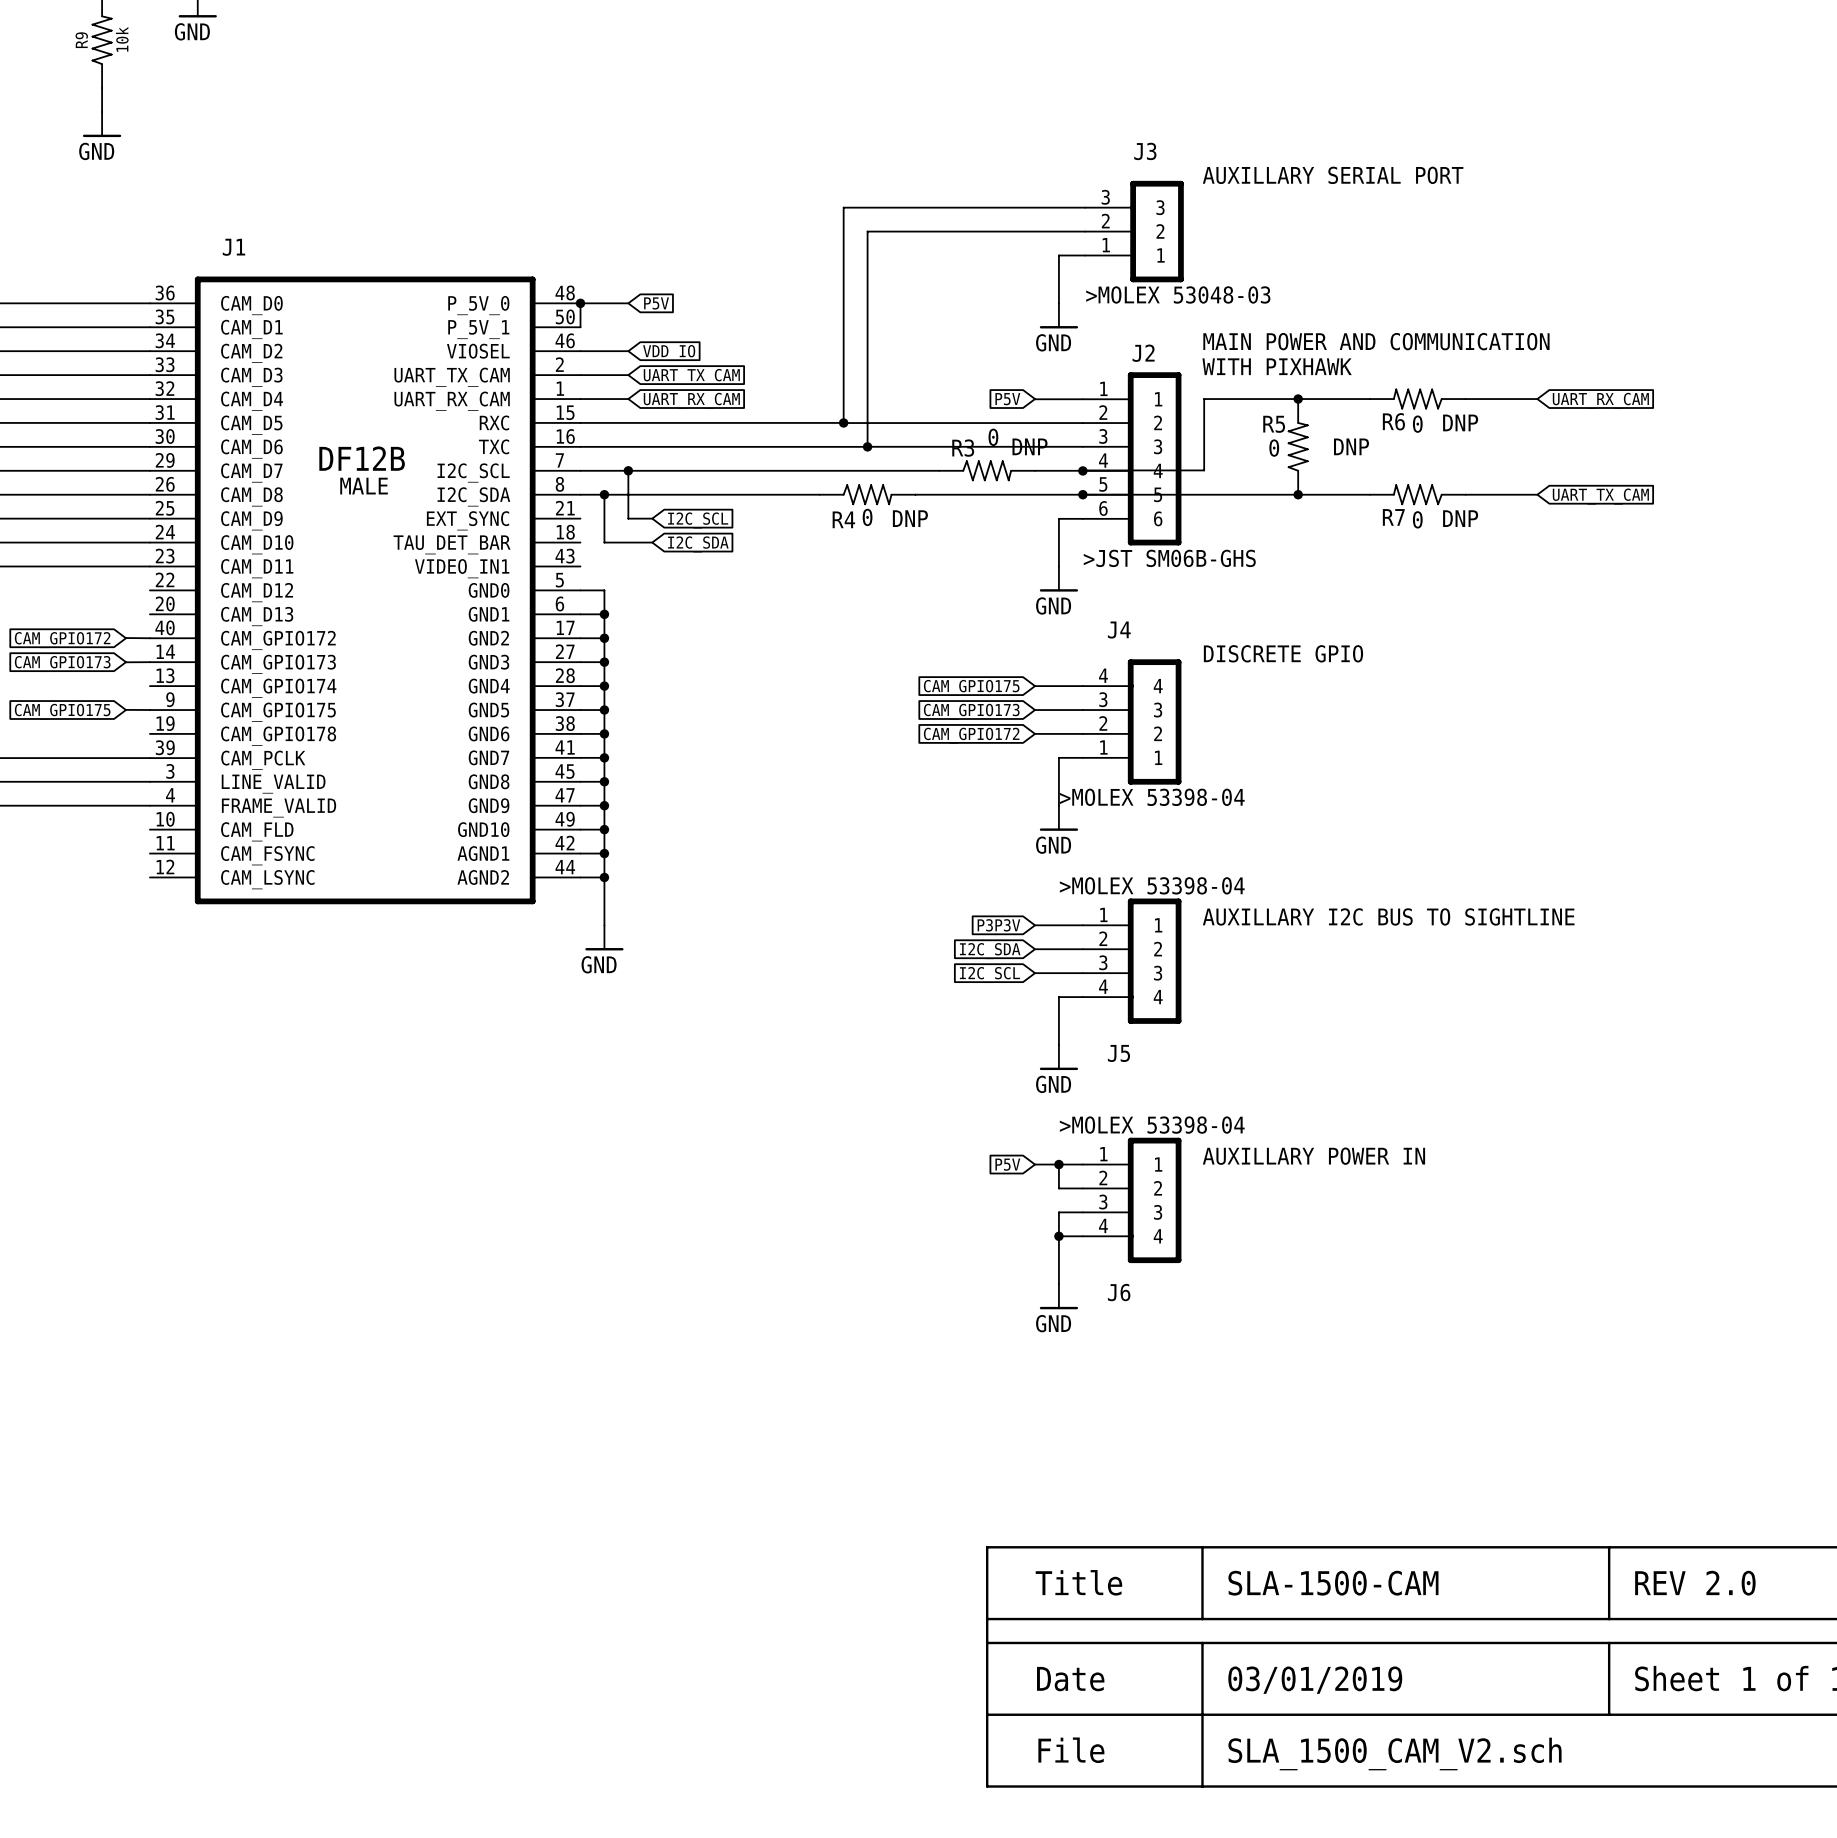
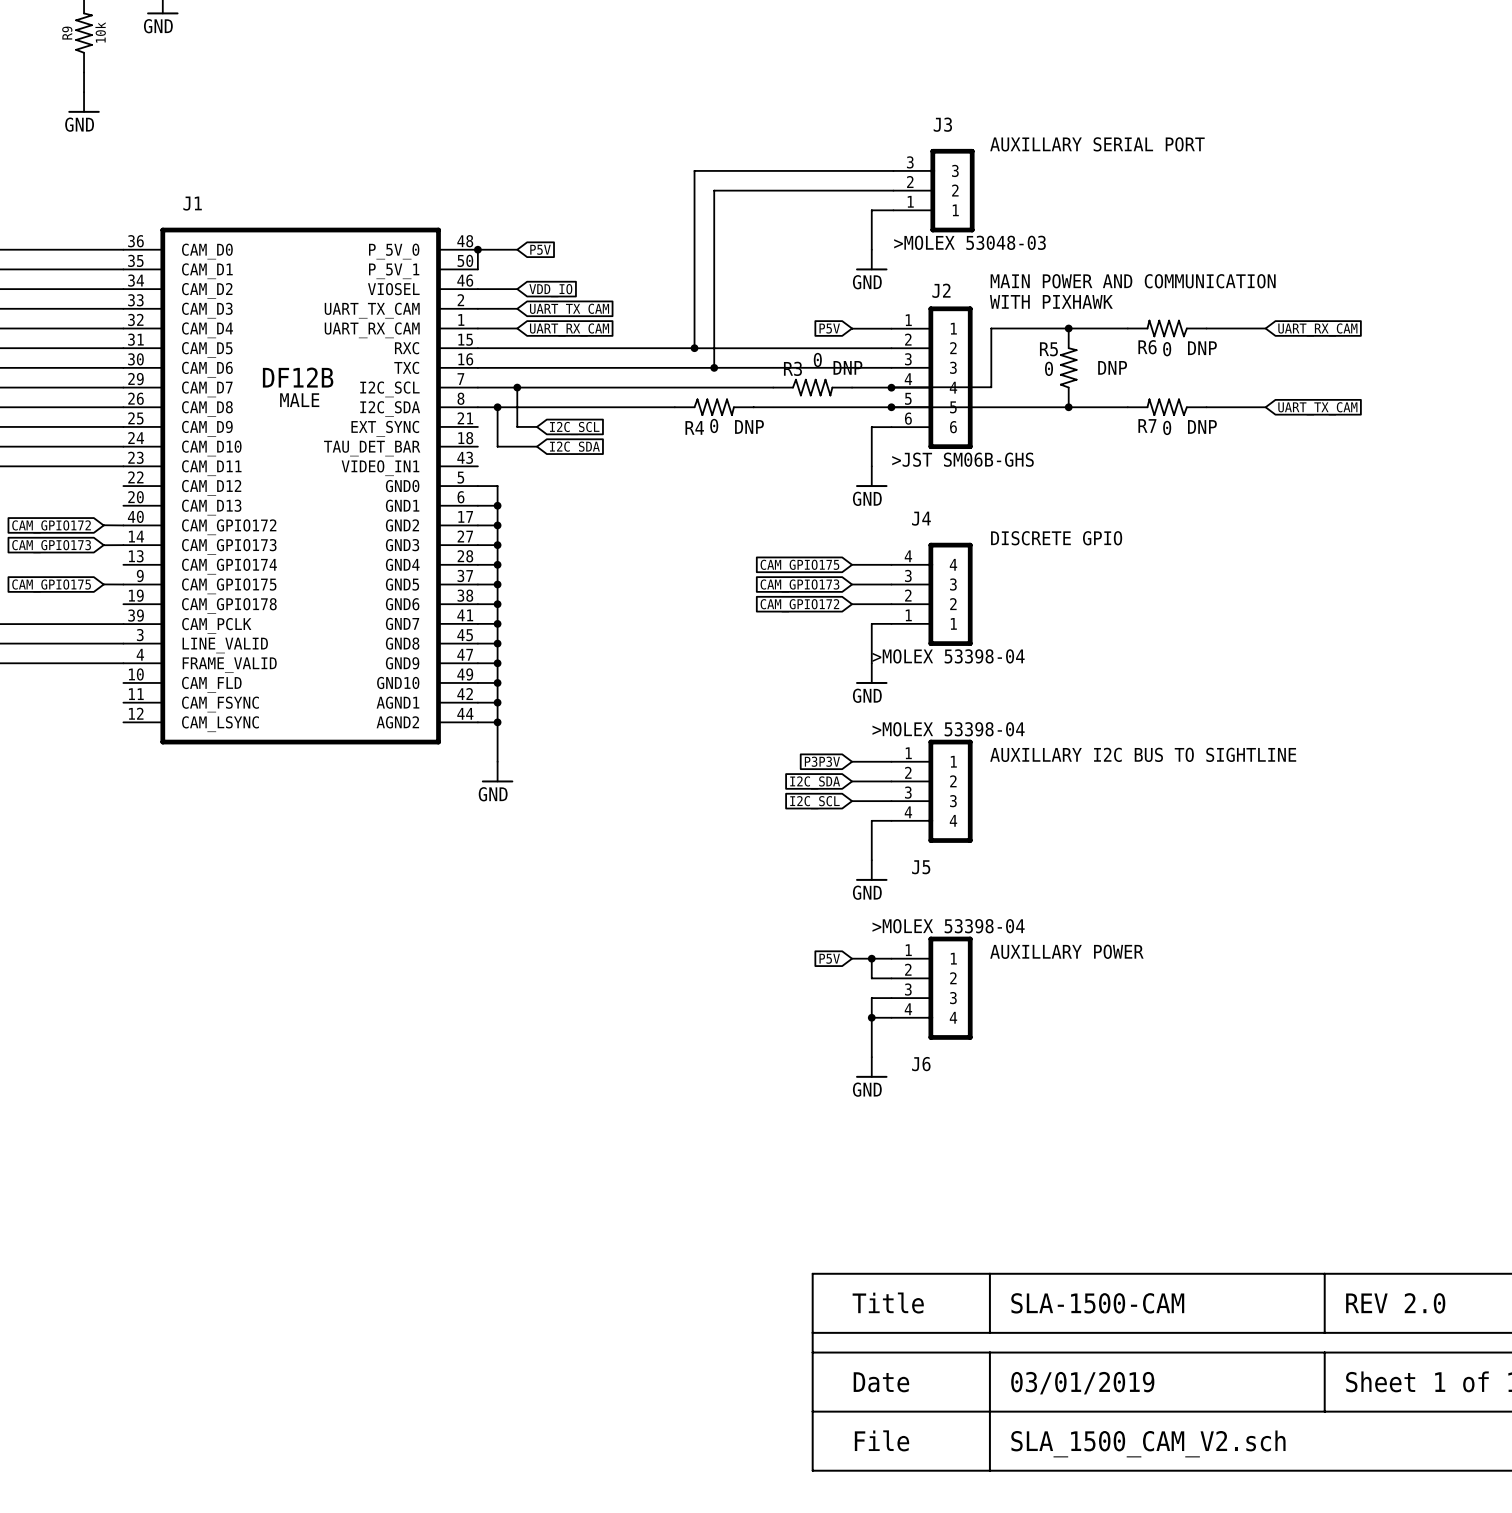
text: AUXILLARY POWER IN (1313, 1156) -> AUXILLARY POWER (1066, 951)

